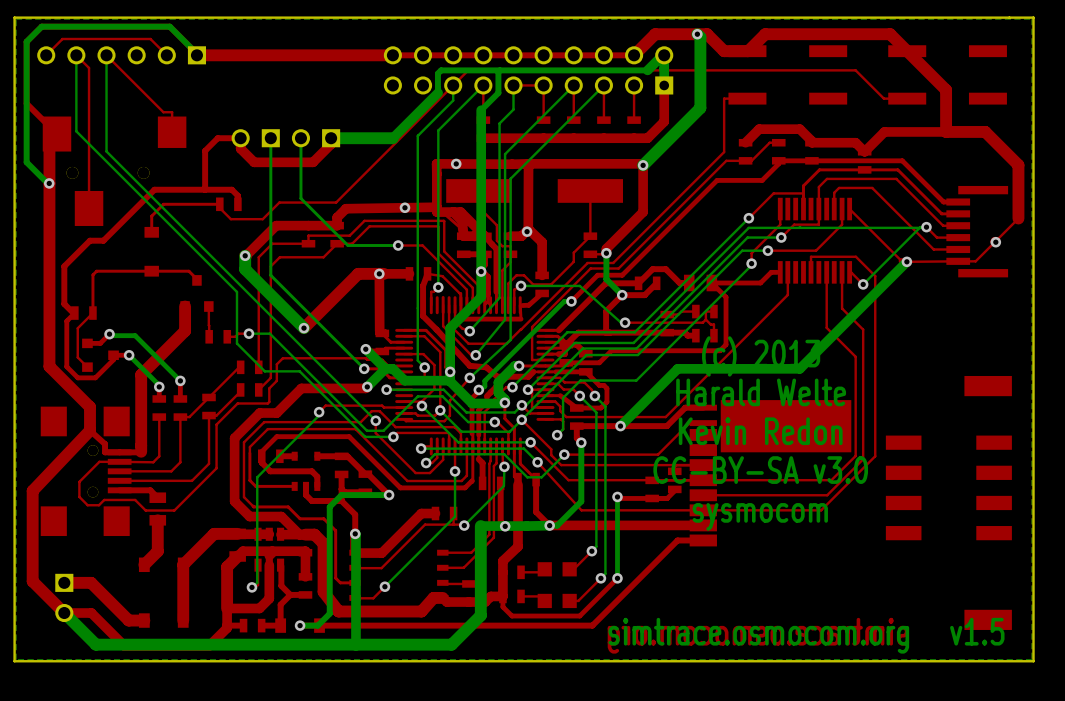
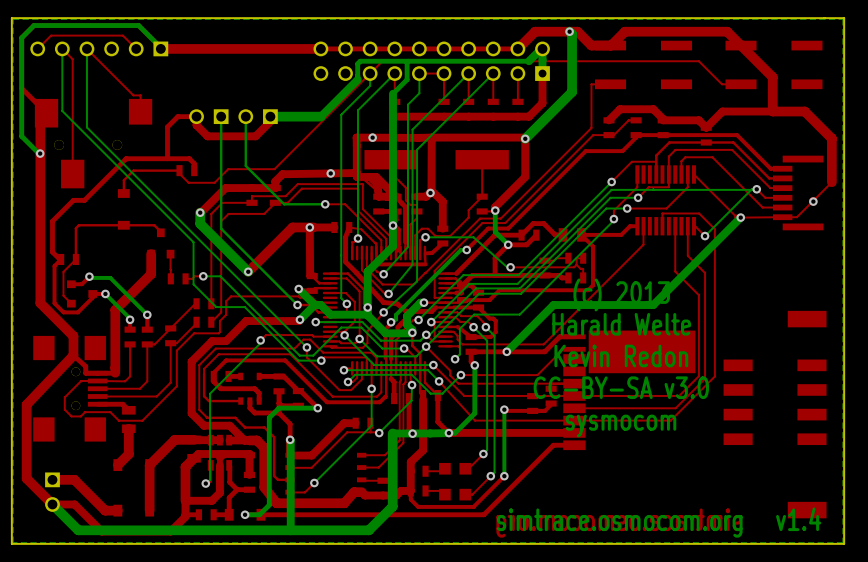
text: v1.5 (977, 631) -> v1.4 (798, 519)

